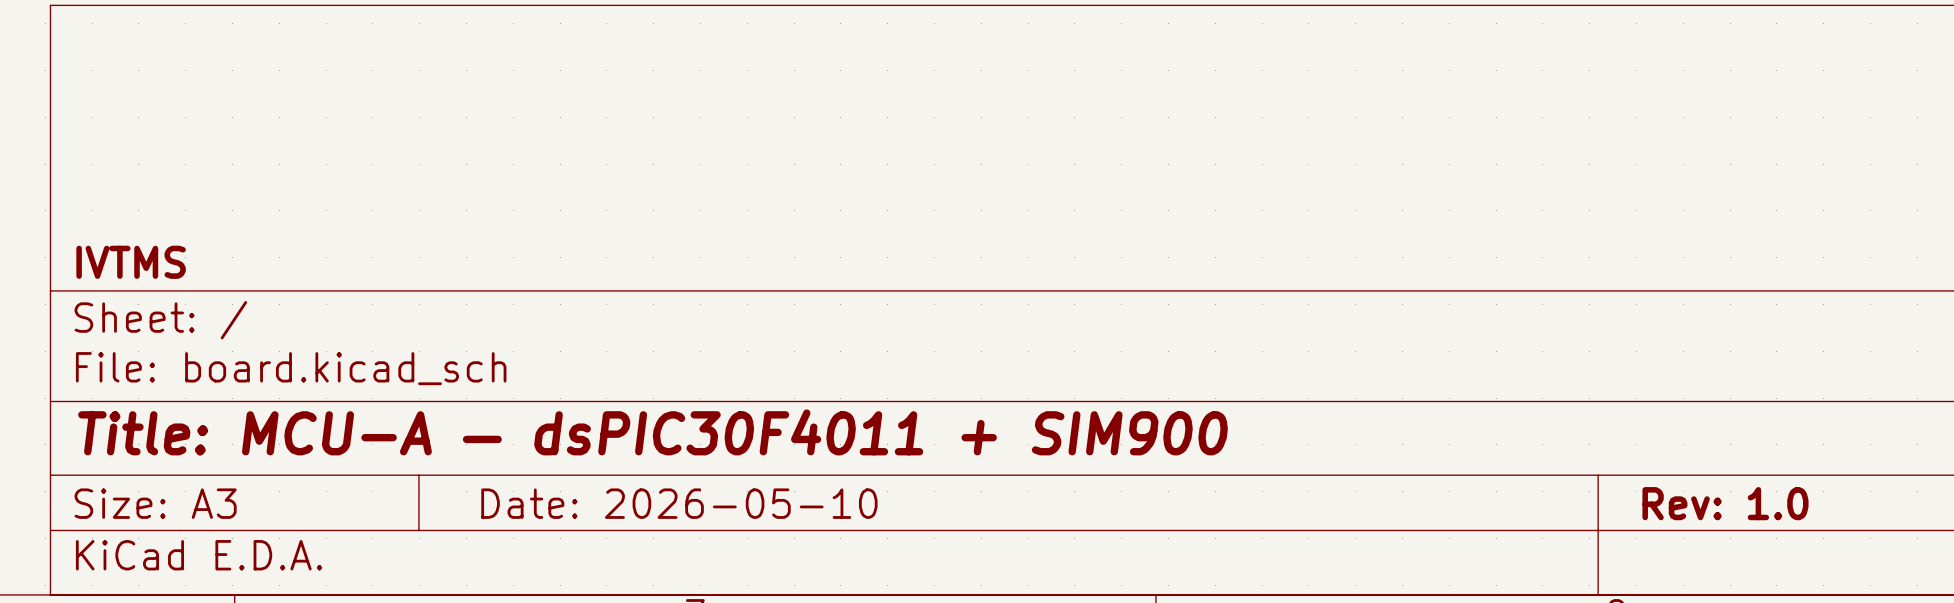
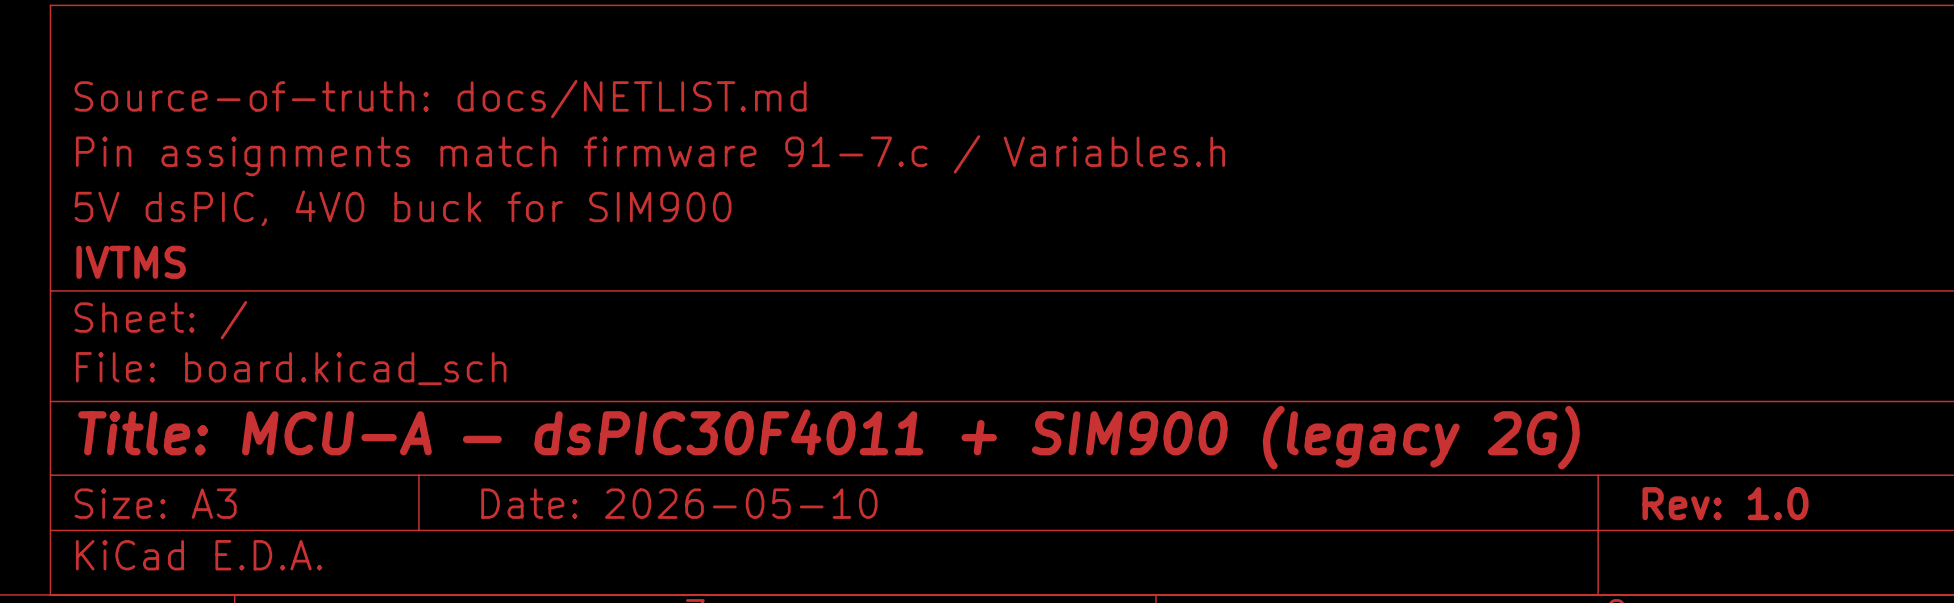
title block: none -> Source-of-truth: docs/NETLIST.md (440, 99)
title block: none -> Pin assignments match firmware 91-7.c / Variables.h (650, 155)
title block: none -> 5V dsPIC, 4V0 buck for SIM900 (403, 208)
title block: Title: MCU-A — dsPIC30F4011 + SIM900 (653, 432) -> Title: MCU-A — dsPIC30F4011 + SIM900 (legacy 2G) (829, 437)

